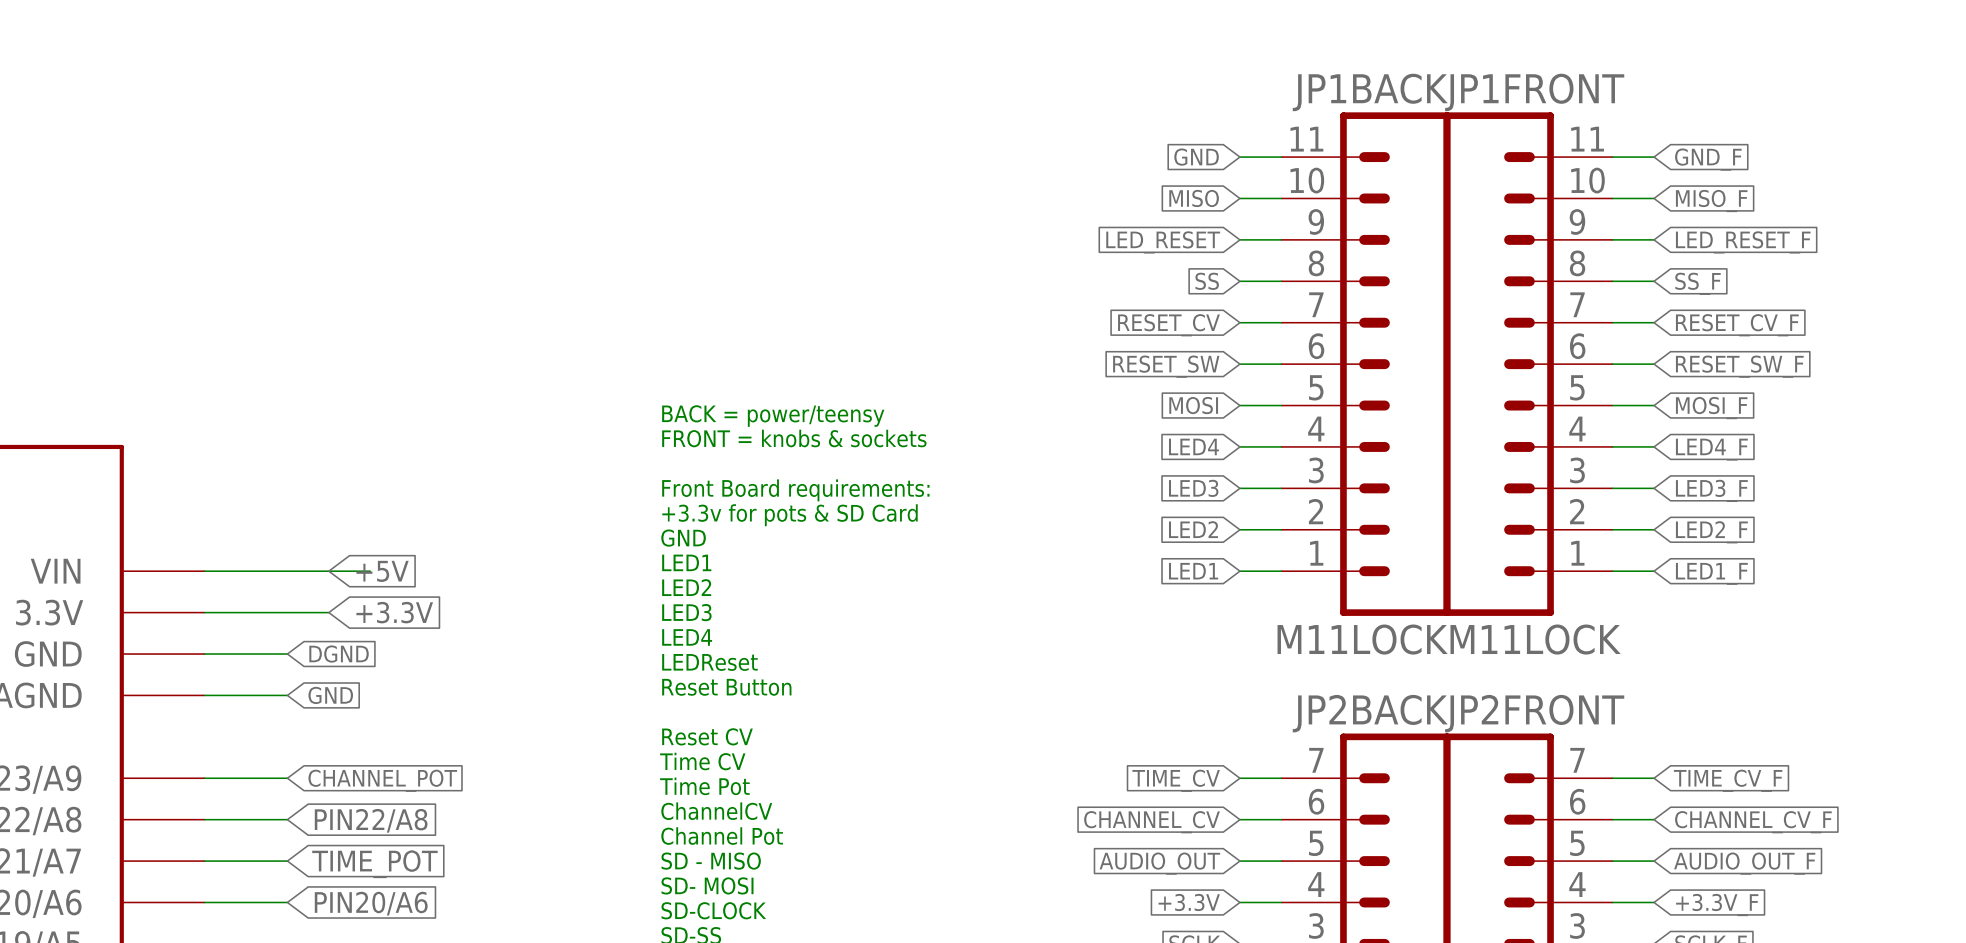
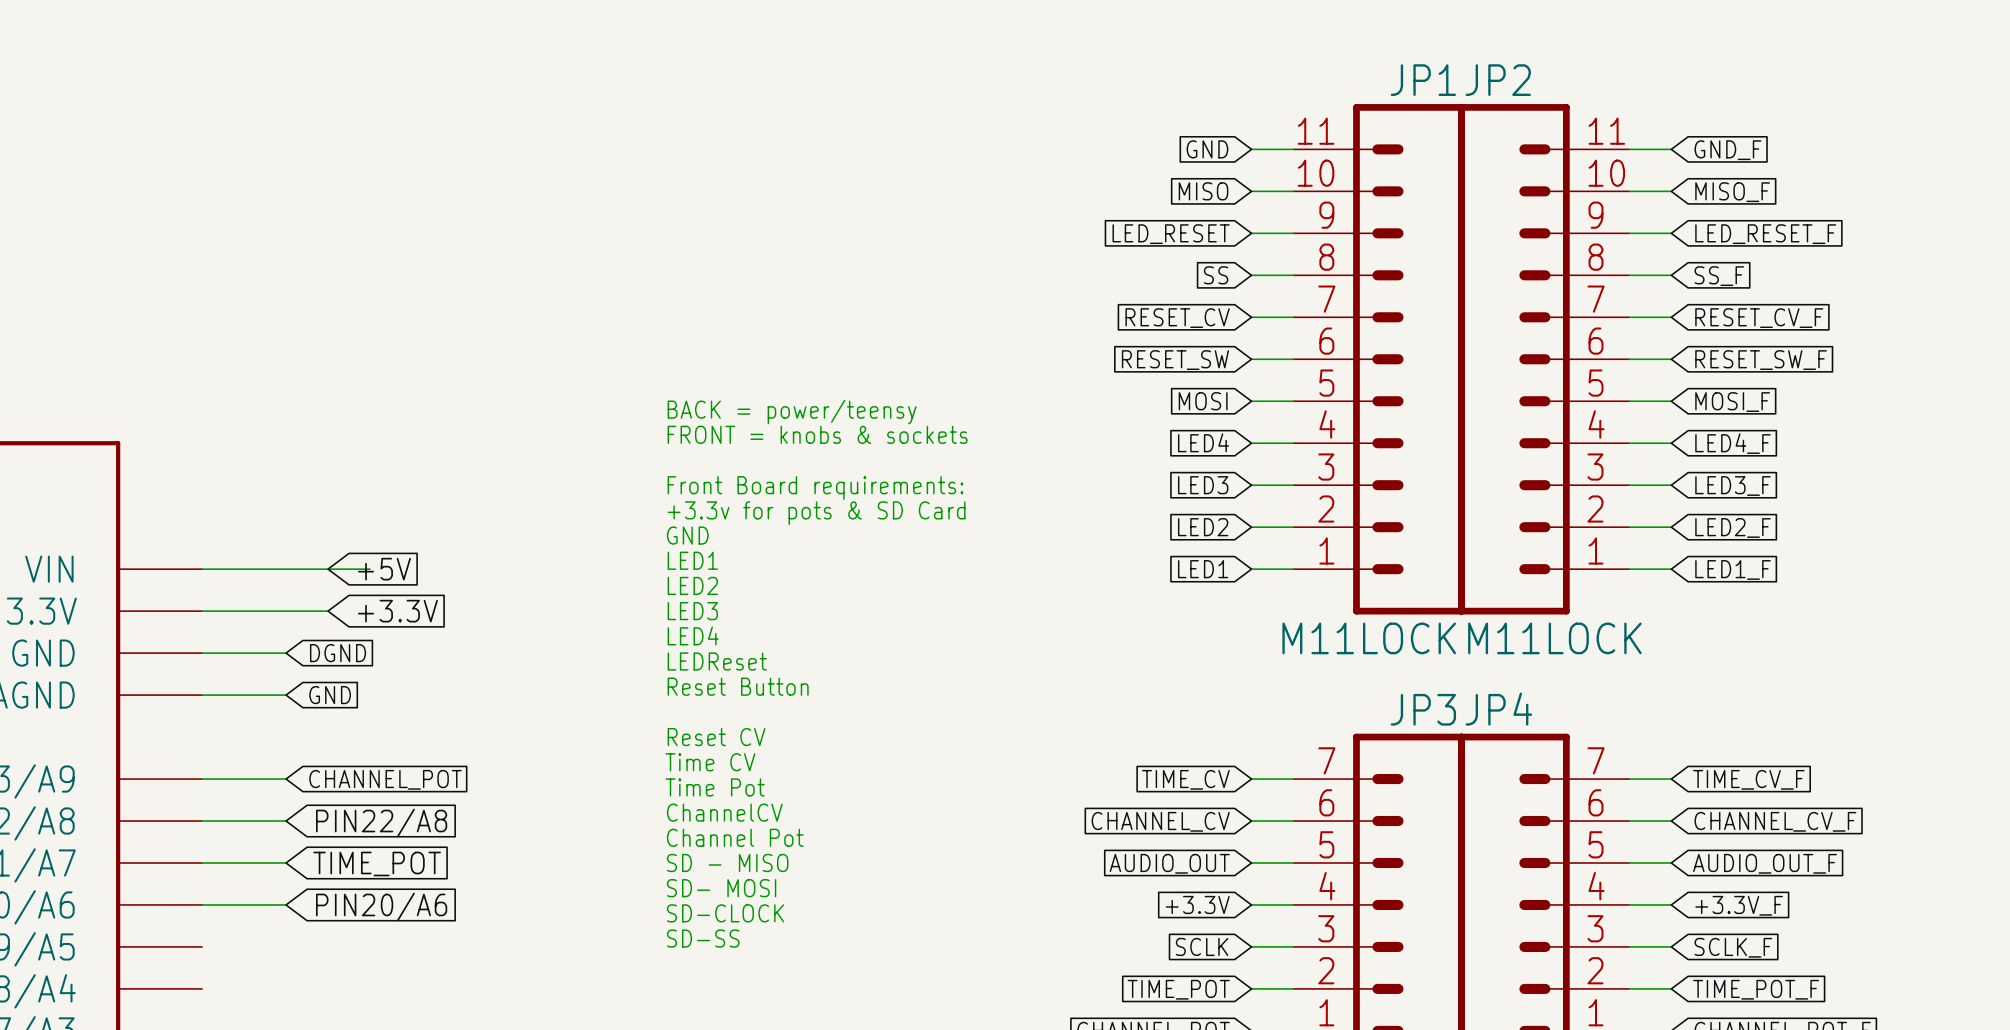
JP1BACK name: JP1BACK (1370, 92) -> JP1 (1423, 80)
JP1FRONT name: JP1FRONT (1534, 92) -> JP2 (1498, 80)
JP2BACK name: JP2BACK (1370, 713) -> JP3 (1423, 709)
JP2FRONT name: JP2FRONT (1534, 713) -> JP4 (1498, 709)

